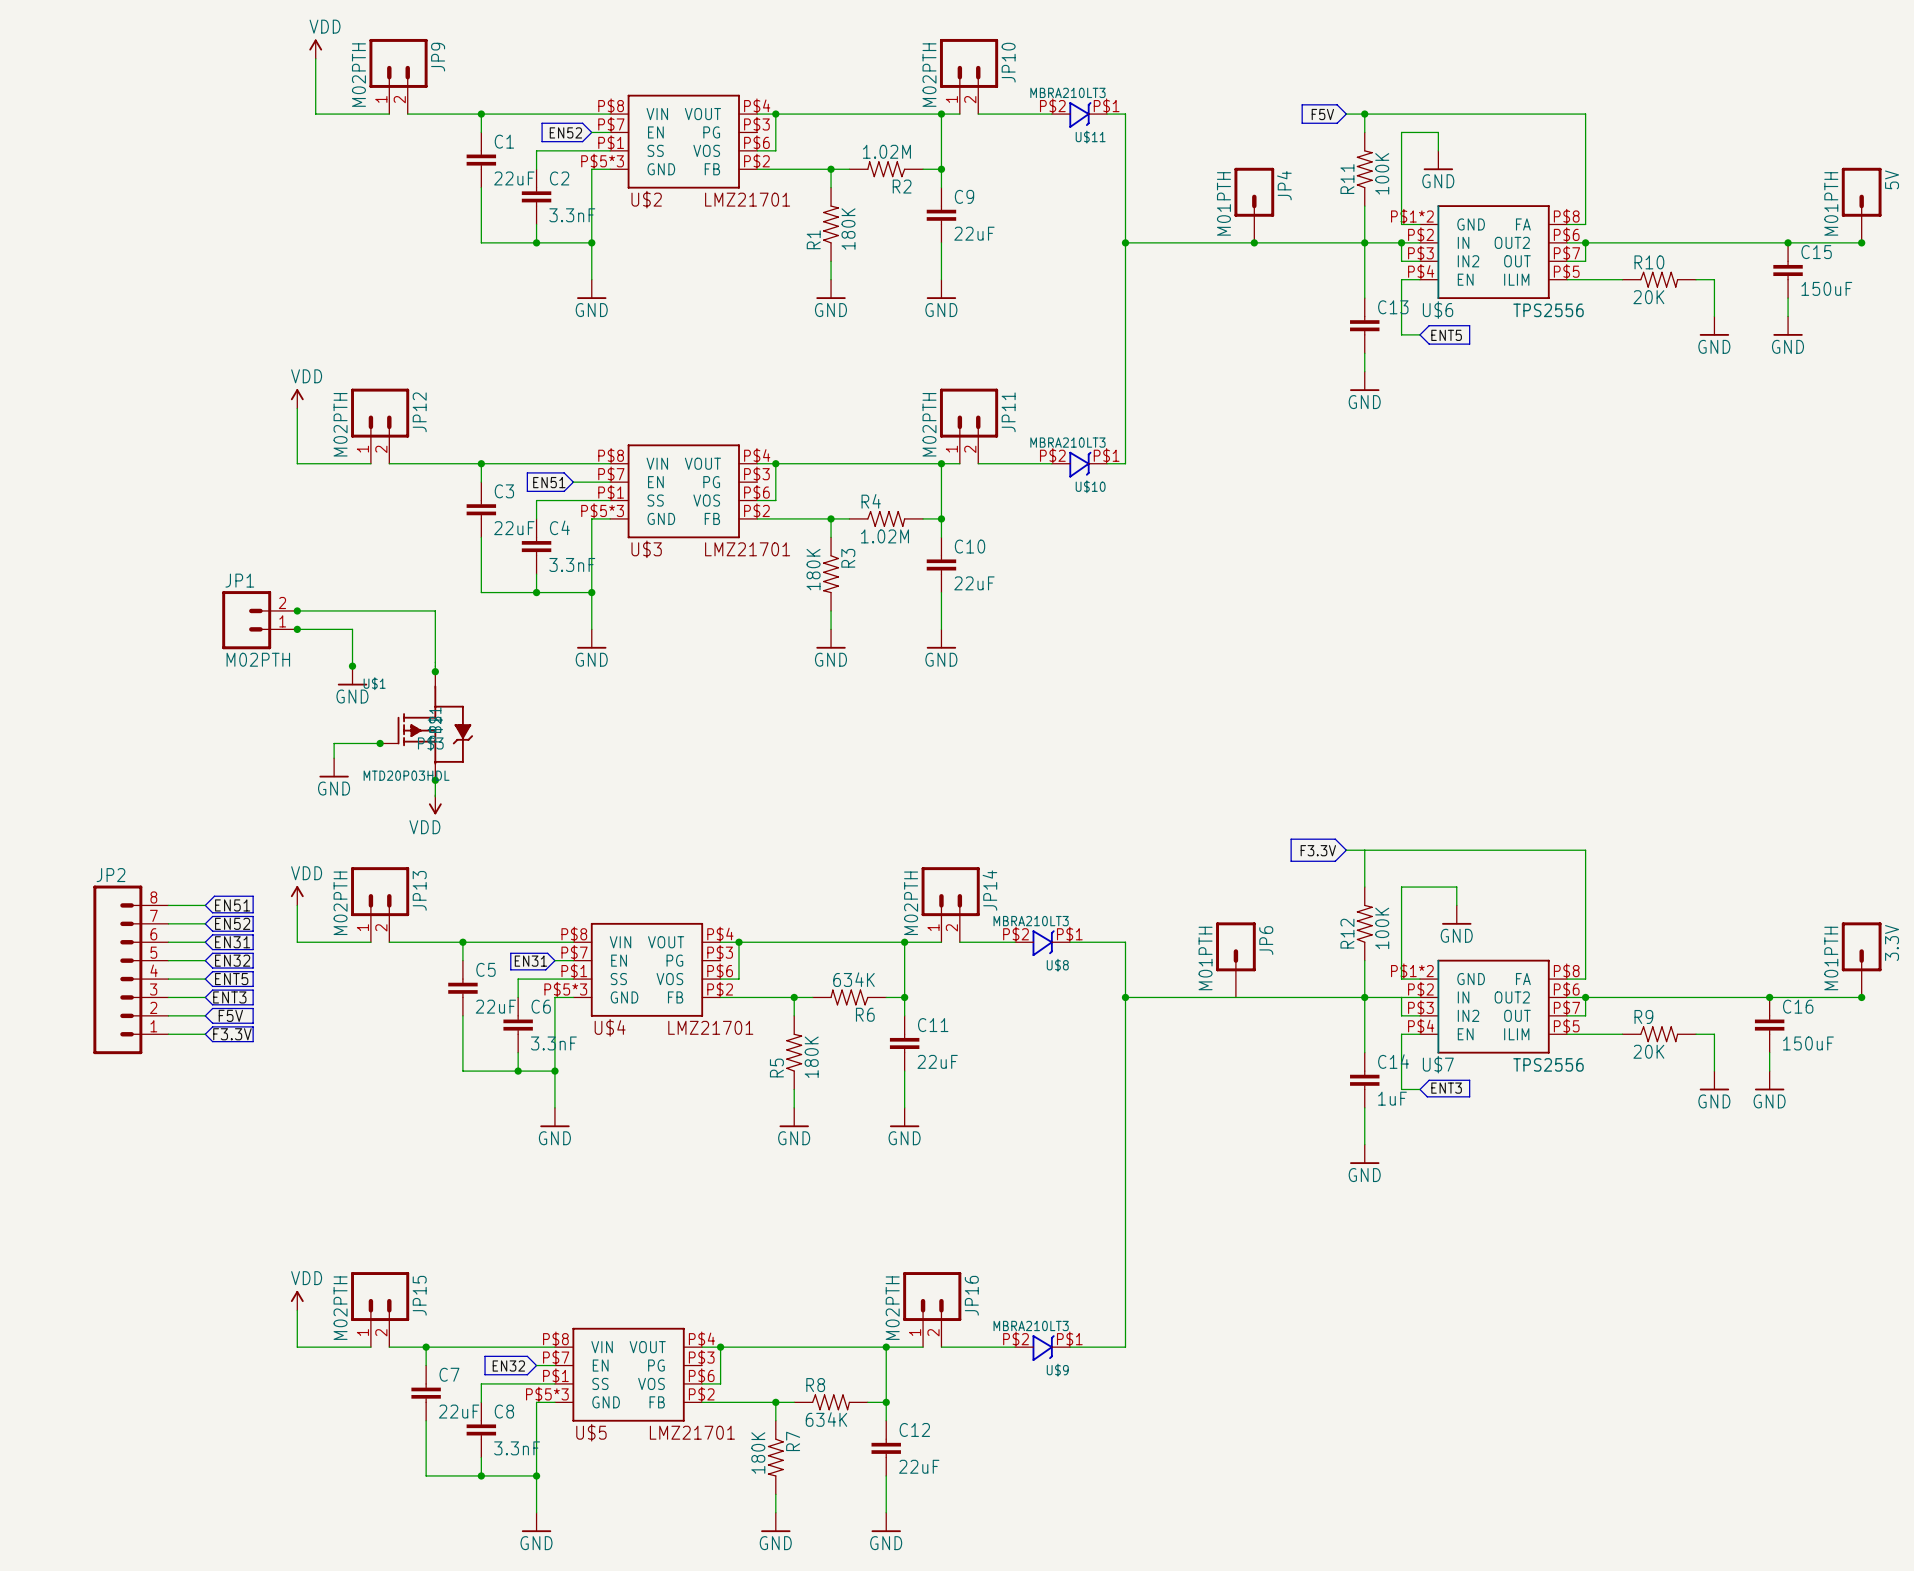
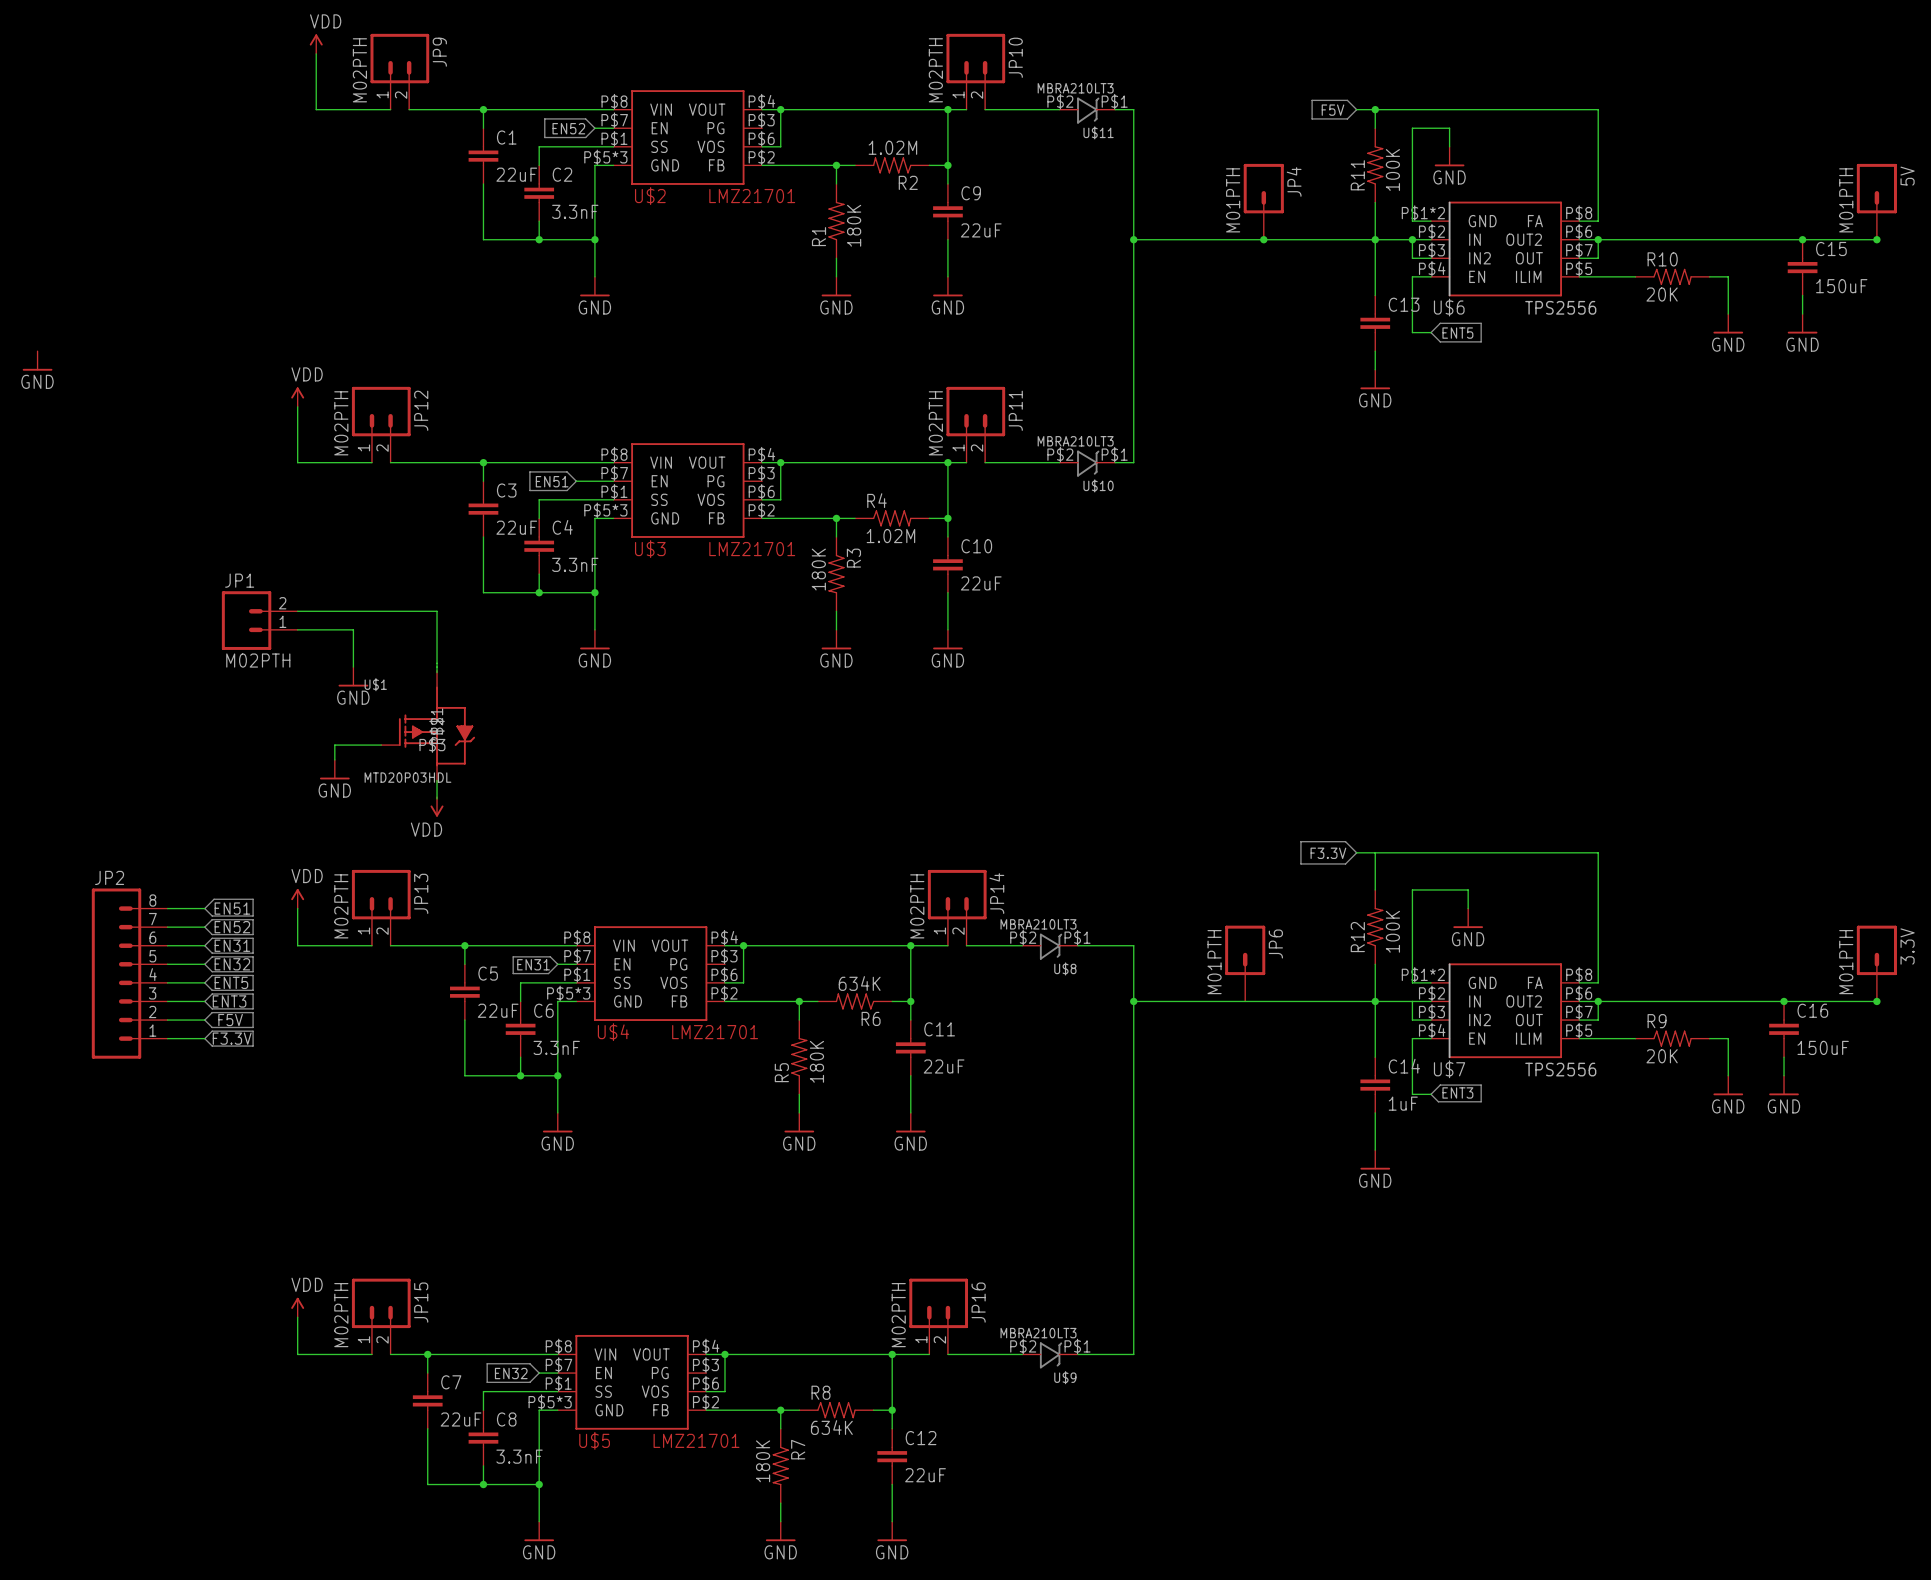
power symbol: none -> GND (37, 360)
junction: (297, 610) -> none
junction: (297, 629) -> none
junction: (352, 666) -> none
junction: (435, 671) -> none
junction: (380, 743) -> none
junction: (435, 780) -> none

